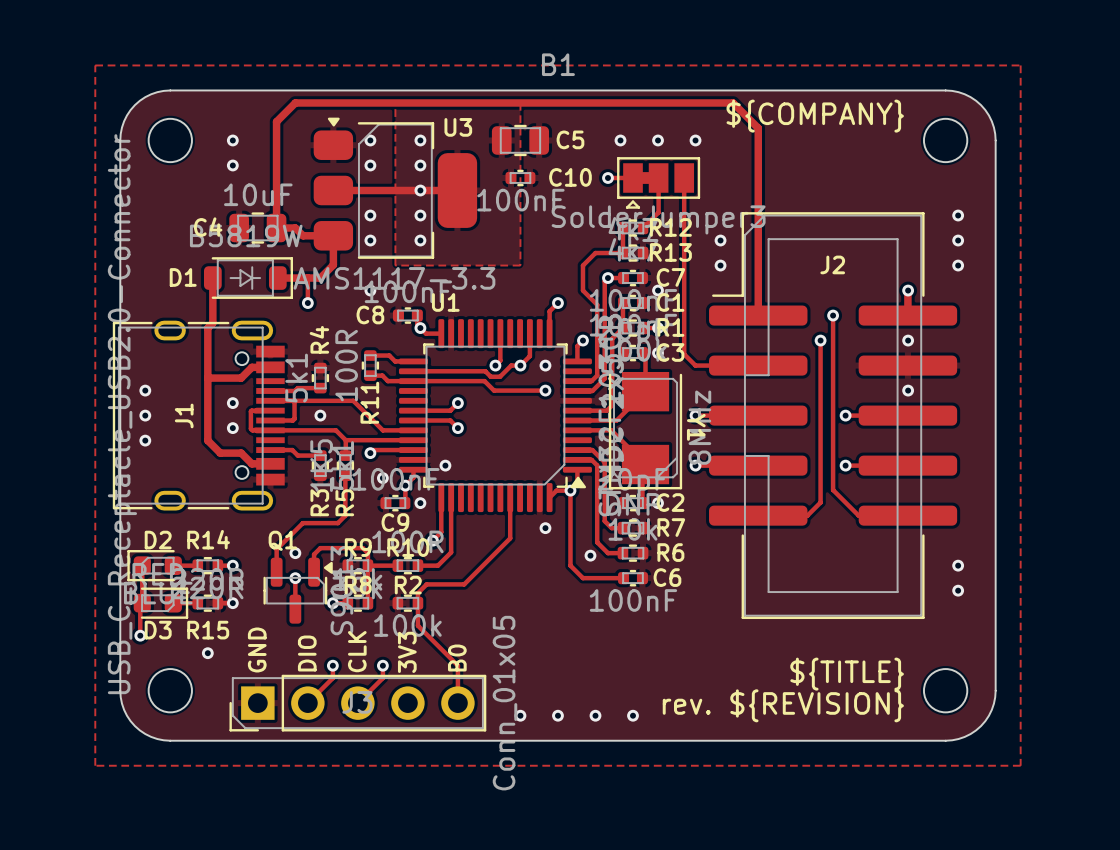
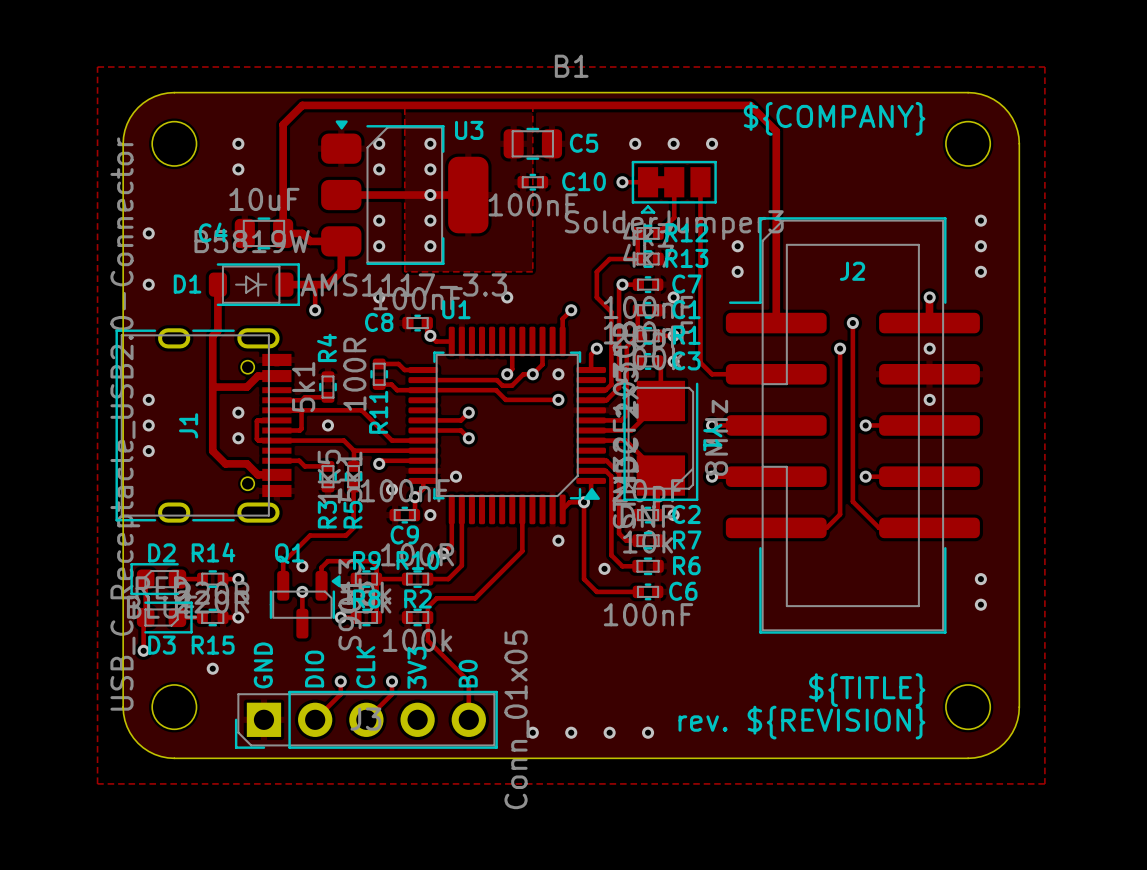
via: none -> (148, 233)
via: none -> (148, 284)
via: none -> (507, 297)

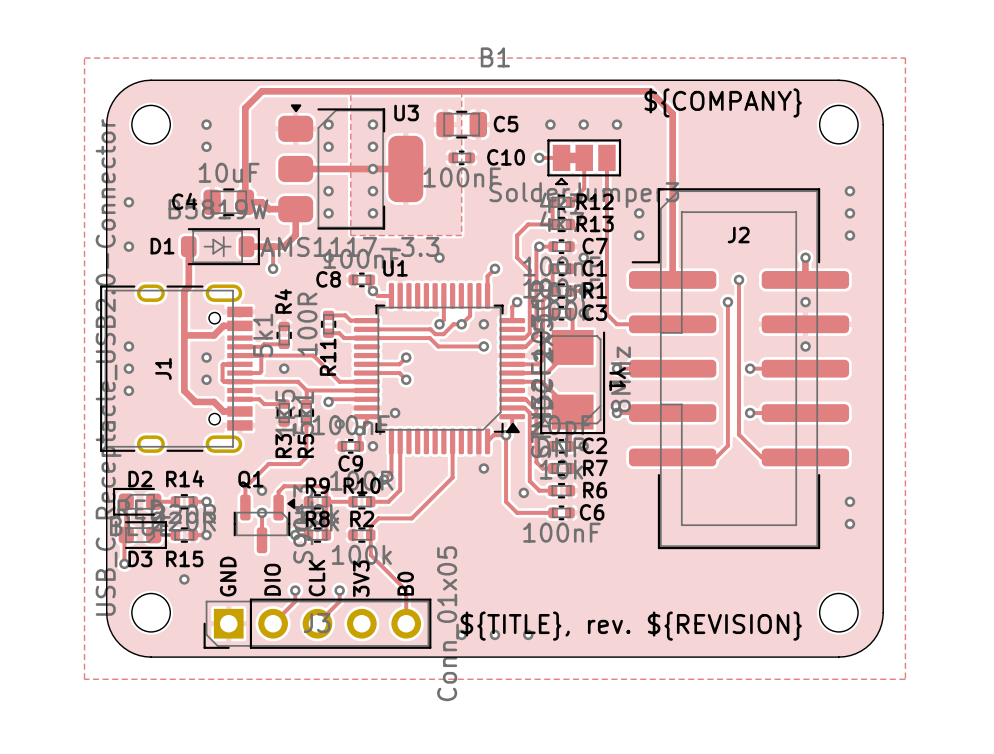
text: ${TITLE} (867, 690) -> none
text: rev. ${REVISION} (801, 722) -> ${TITLE}, rev. ${REVISION} (631, 626)
via: (648, 732) -> none

